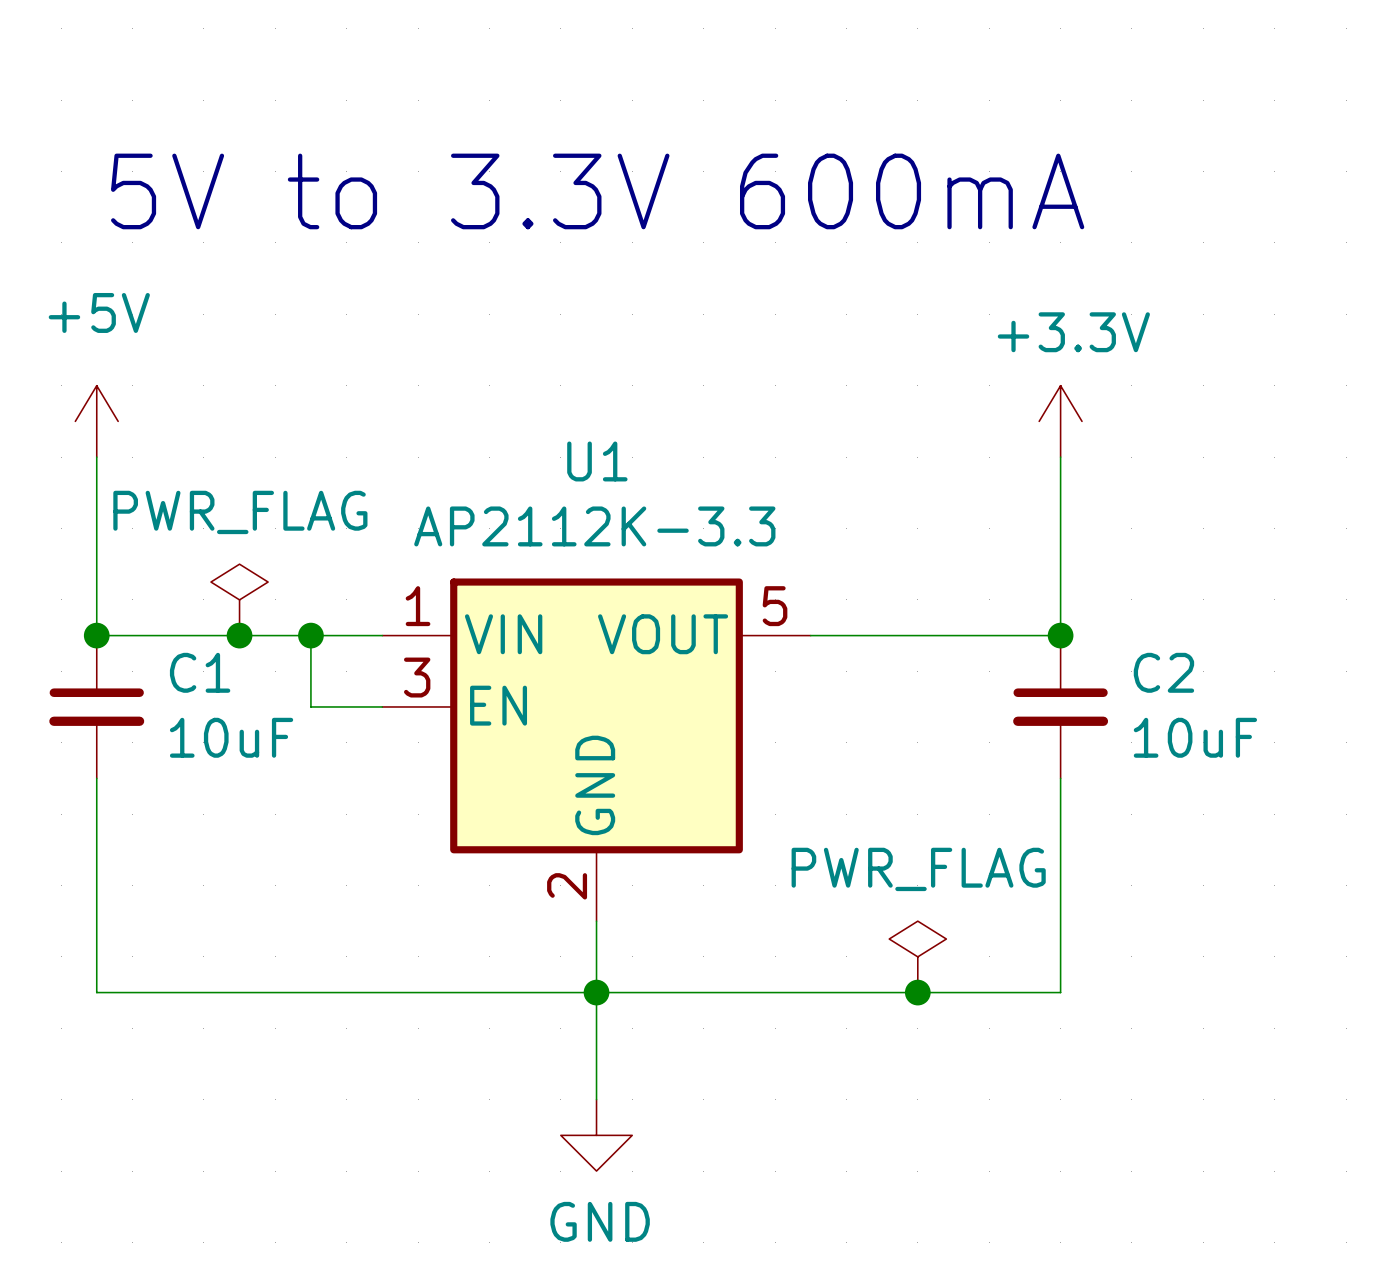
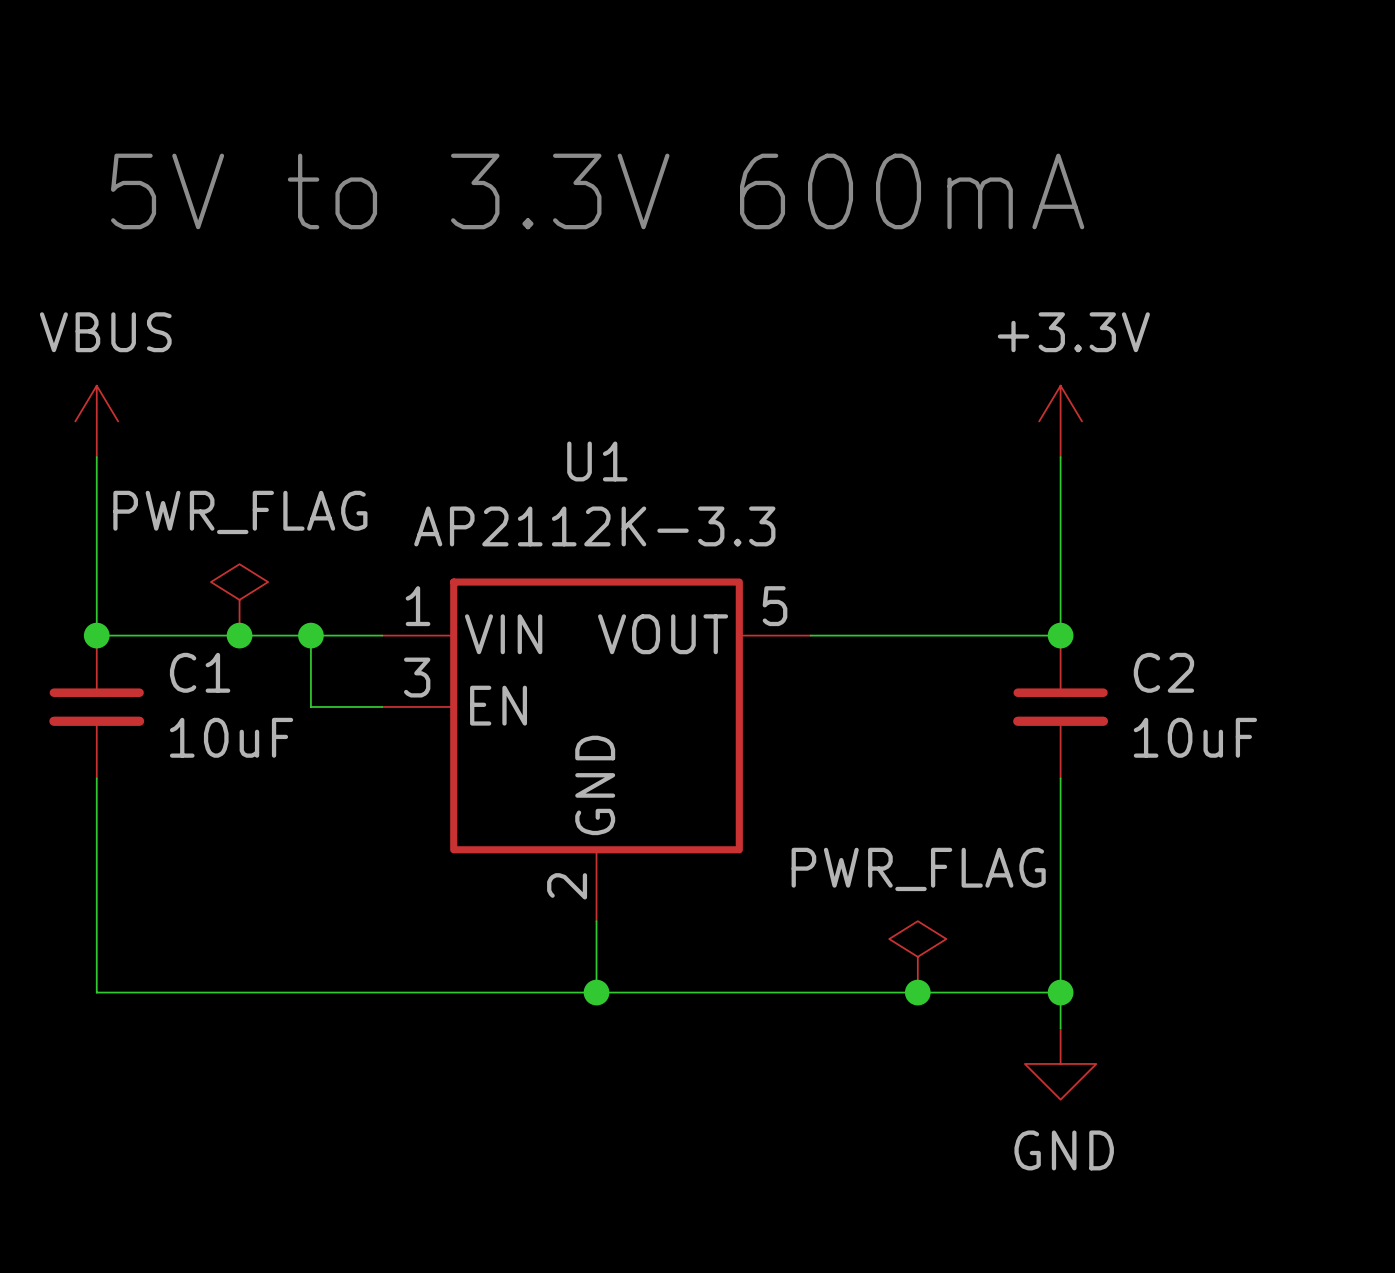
power symbol: +5V (96, 421) -> VBUS (96, 421)
wire: (596, 992) (596, 1099) -> none
wire: none -> (1060, 992) (1060, 1028)
junction: none -> (1060, 992)
power symbol position: GND (596, 1135) -> GND (1060, 1063)

